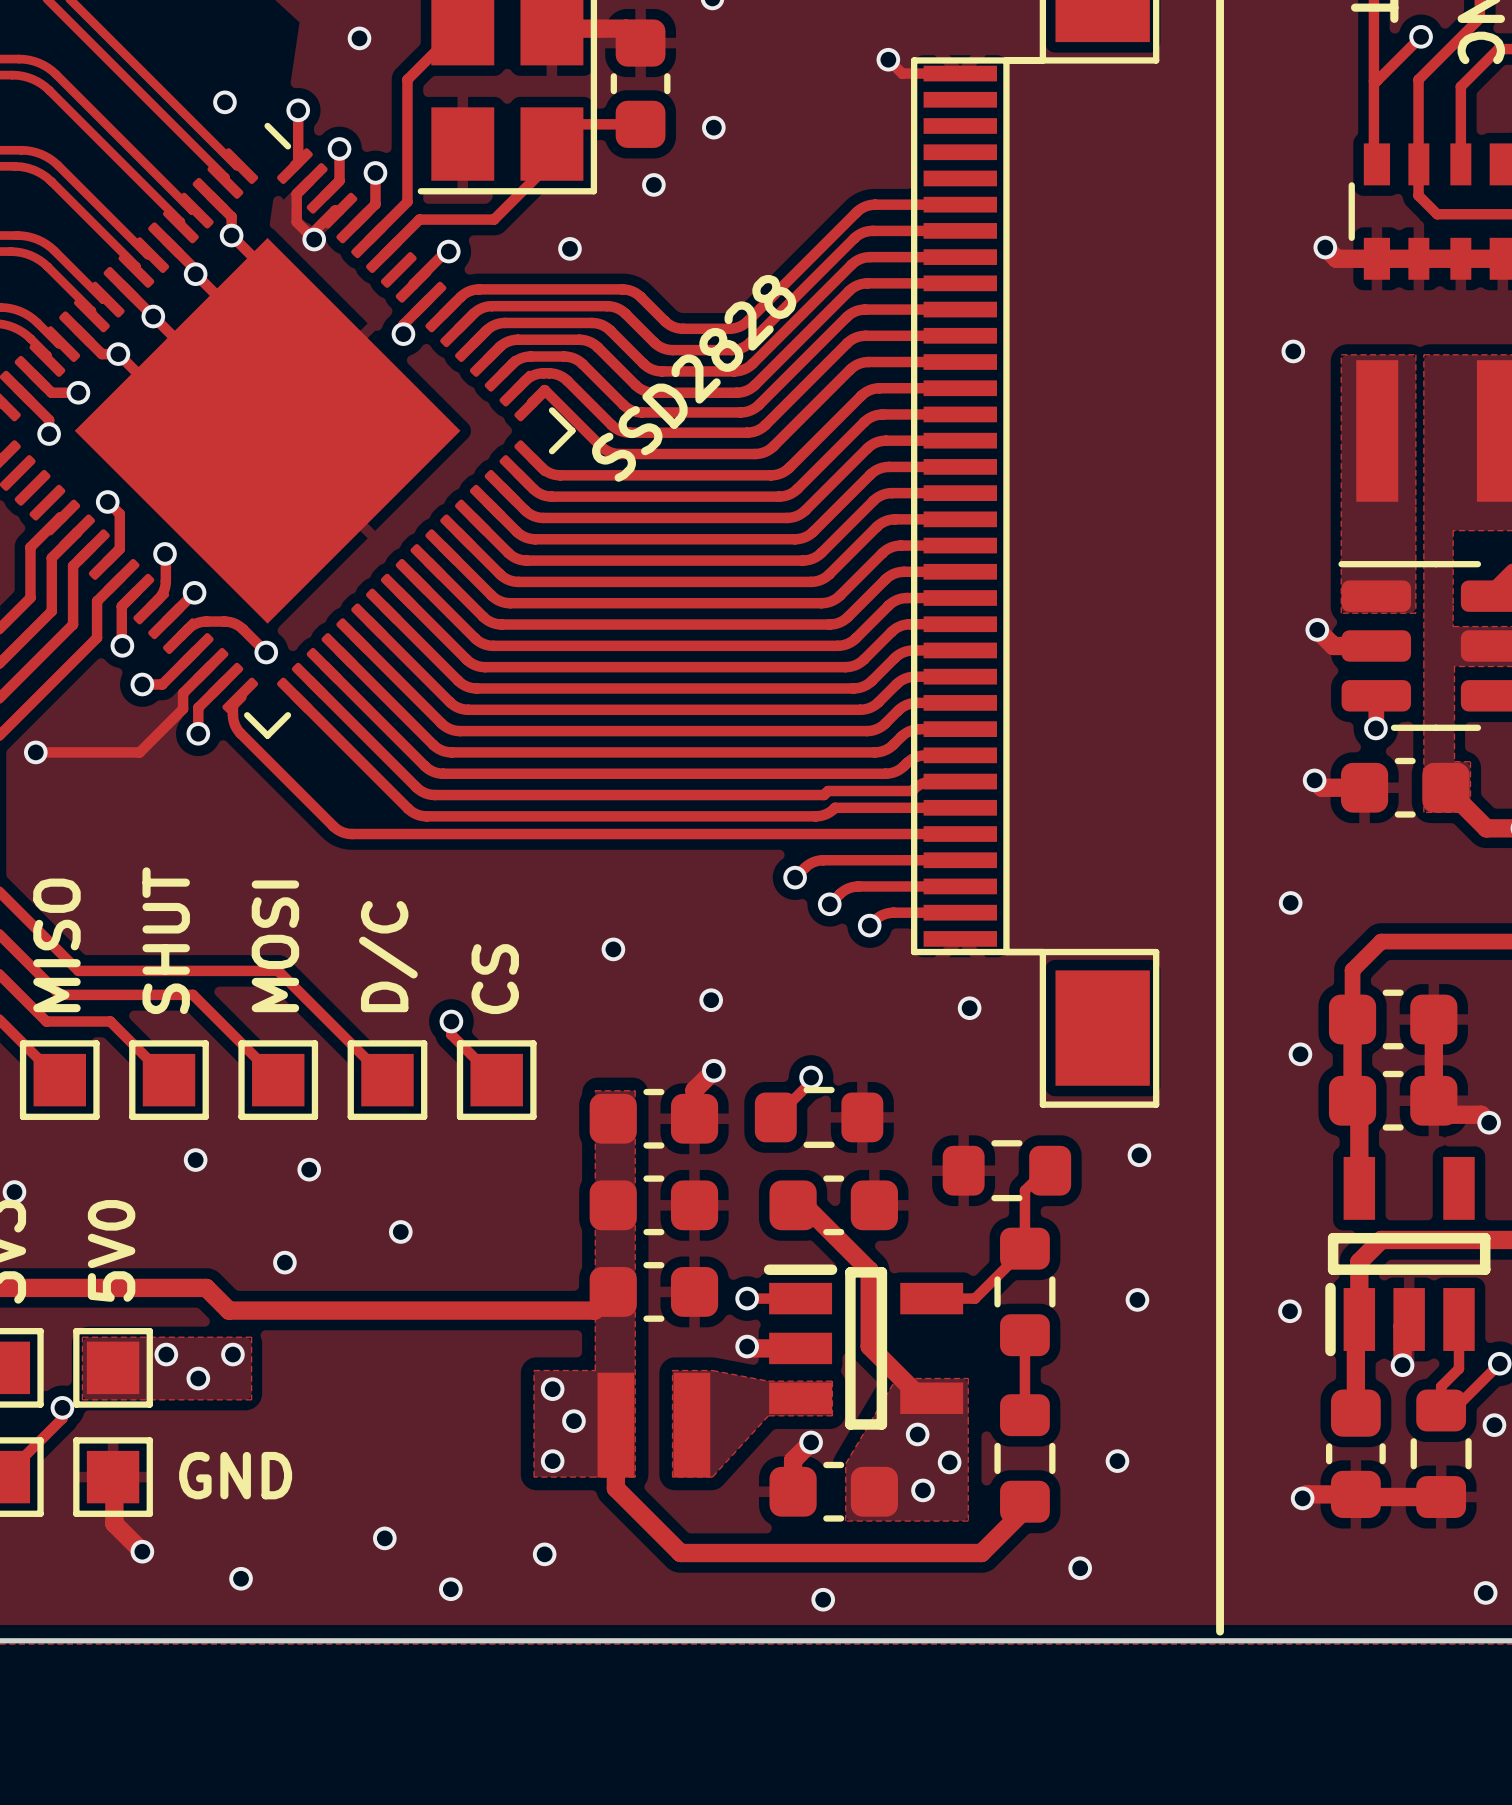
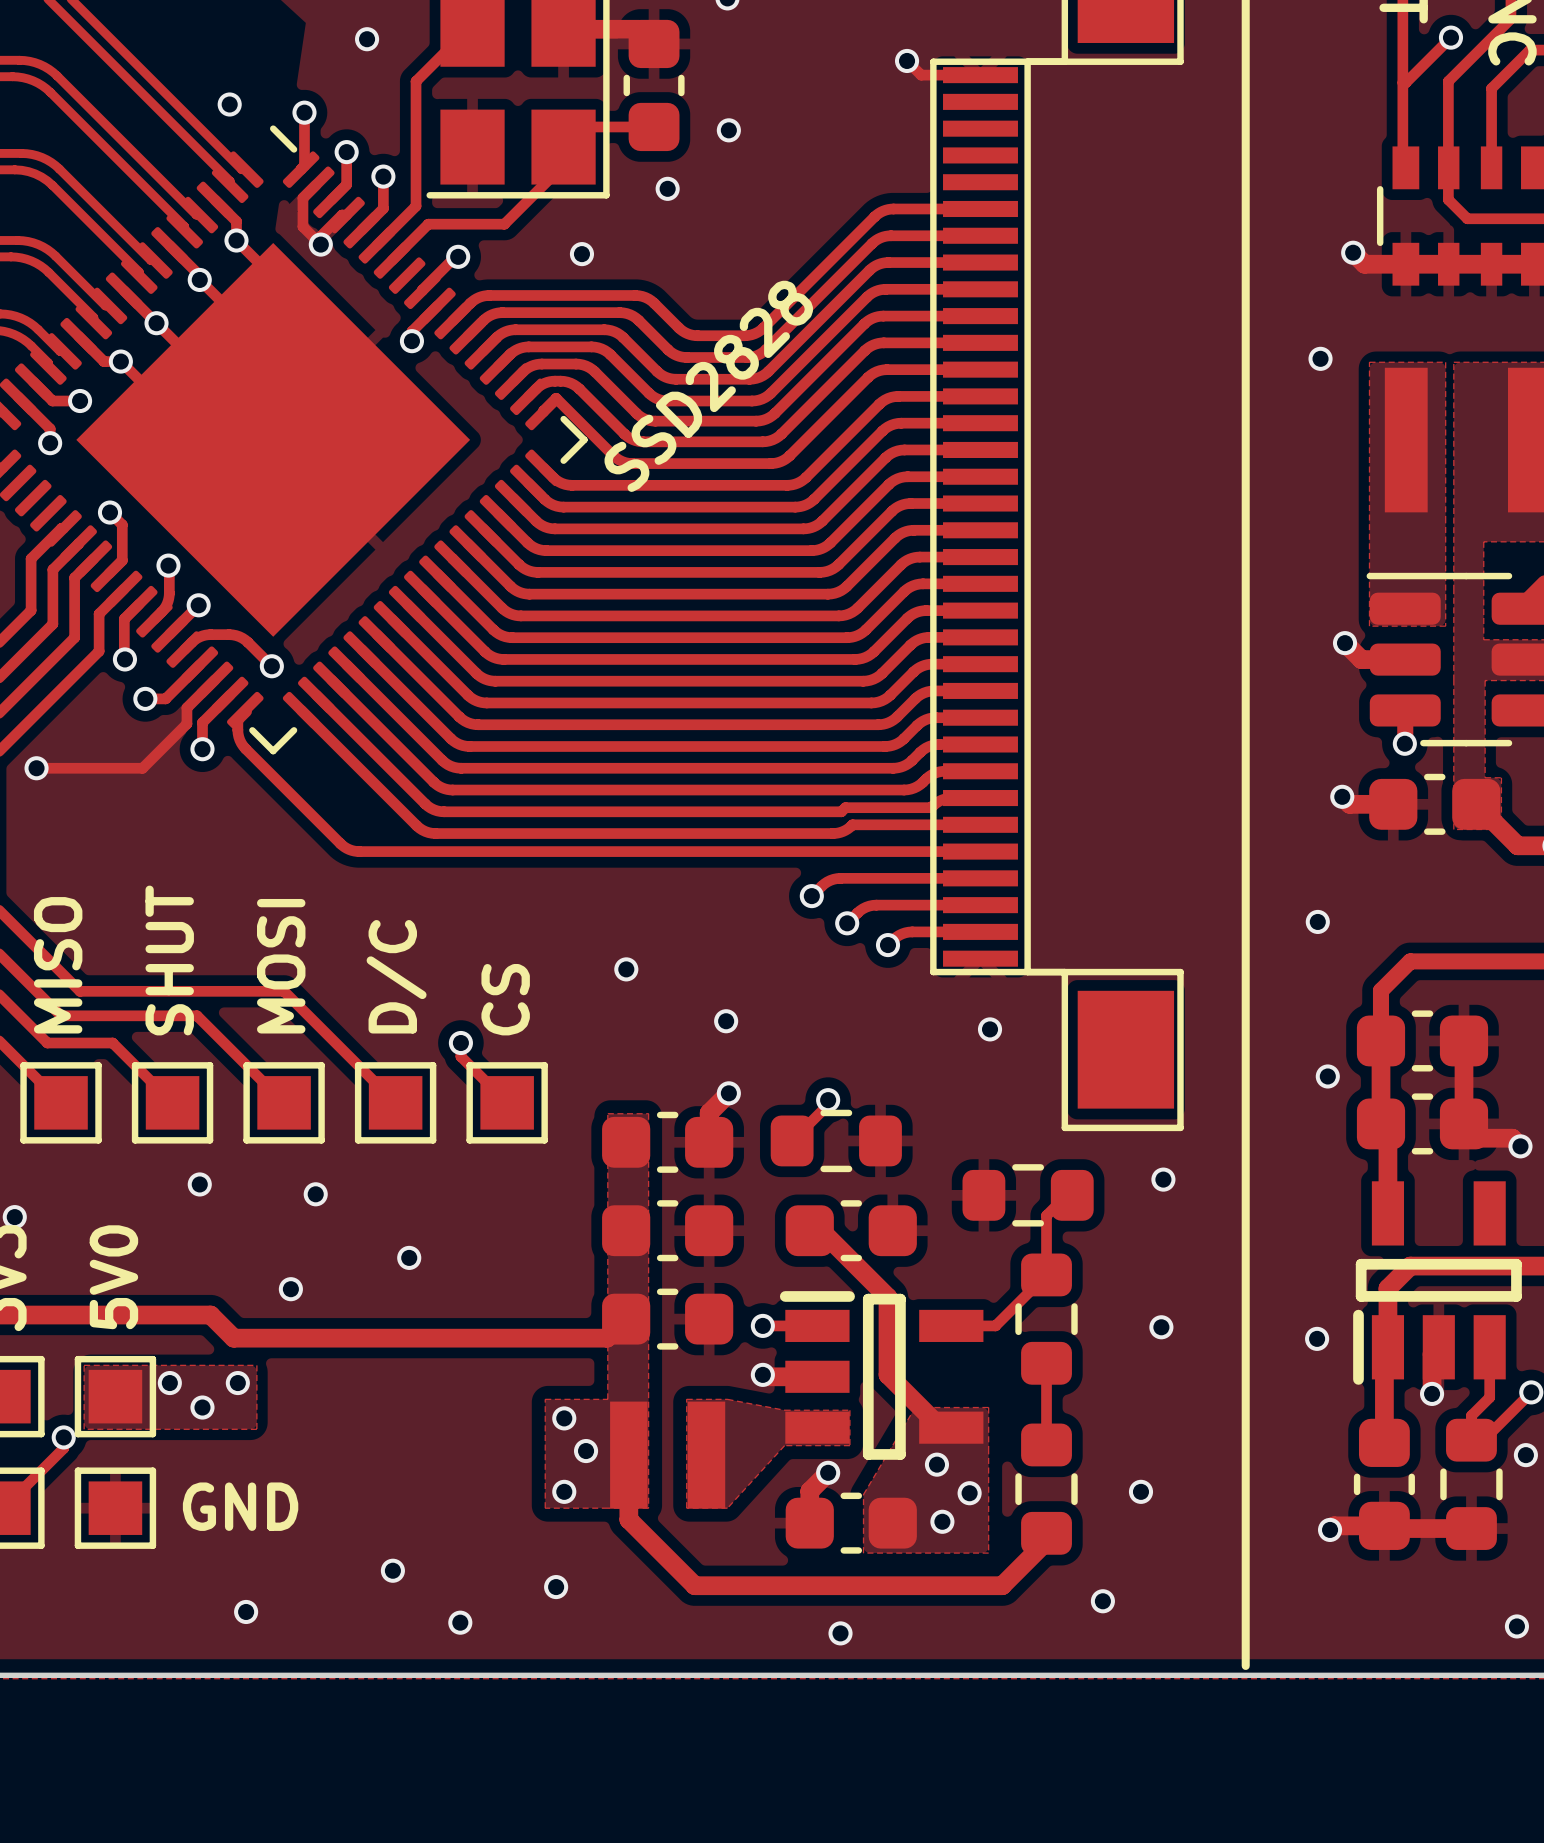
track: (114, 1478) (114, 1523) (142, 1551) -> none
via: (142, 1551) -> none

